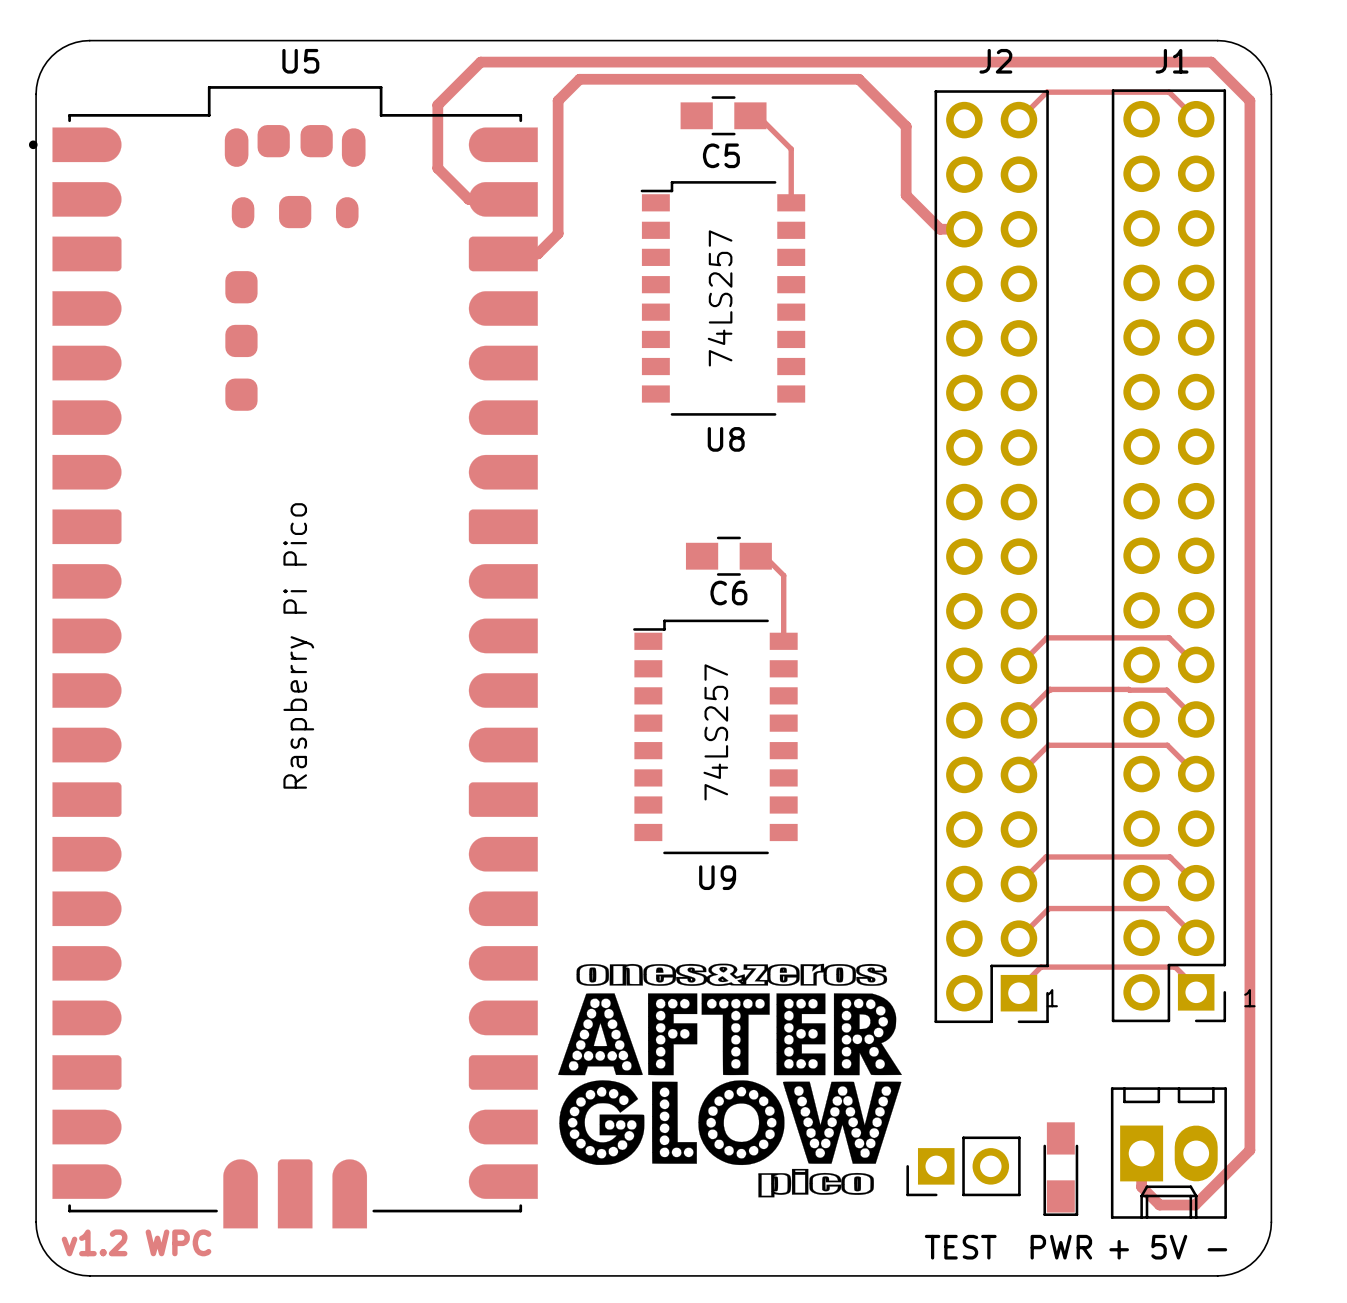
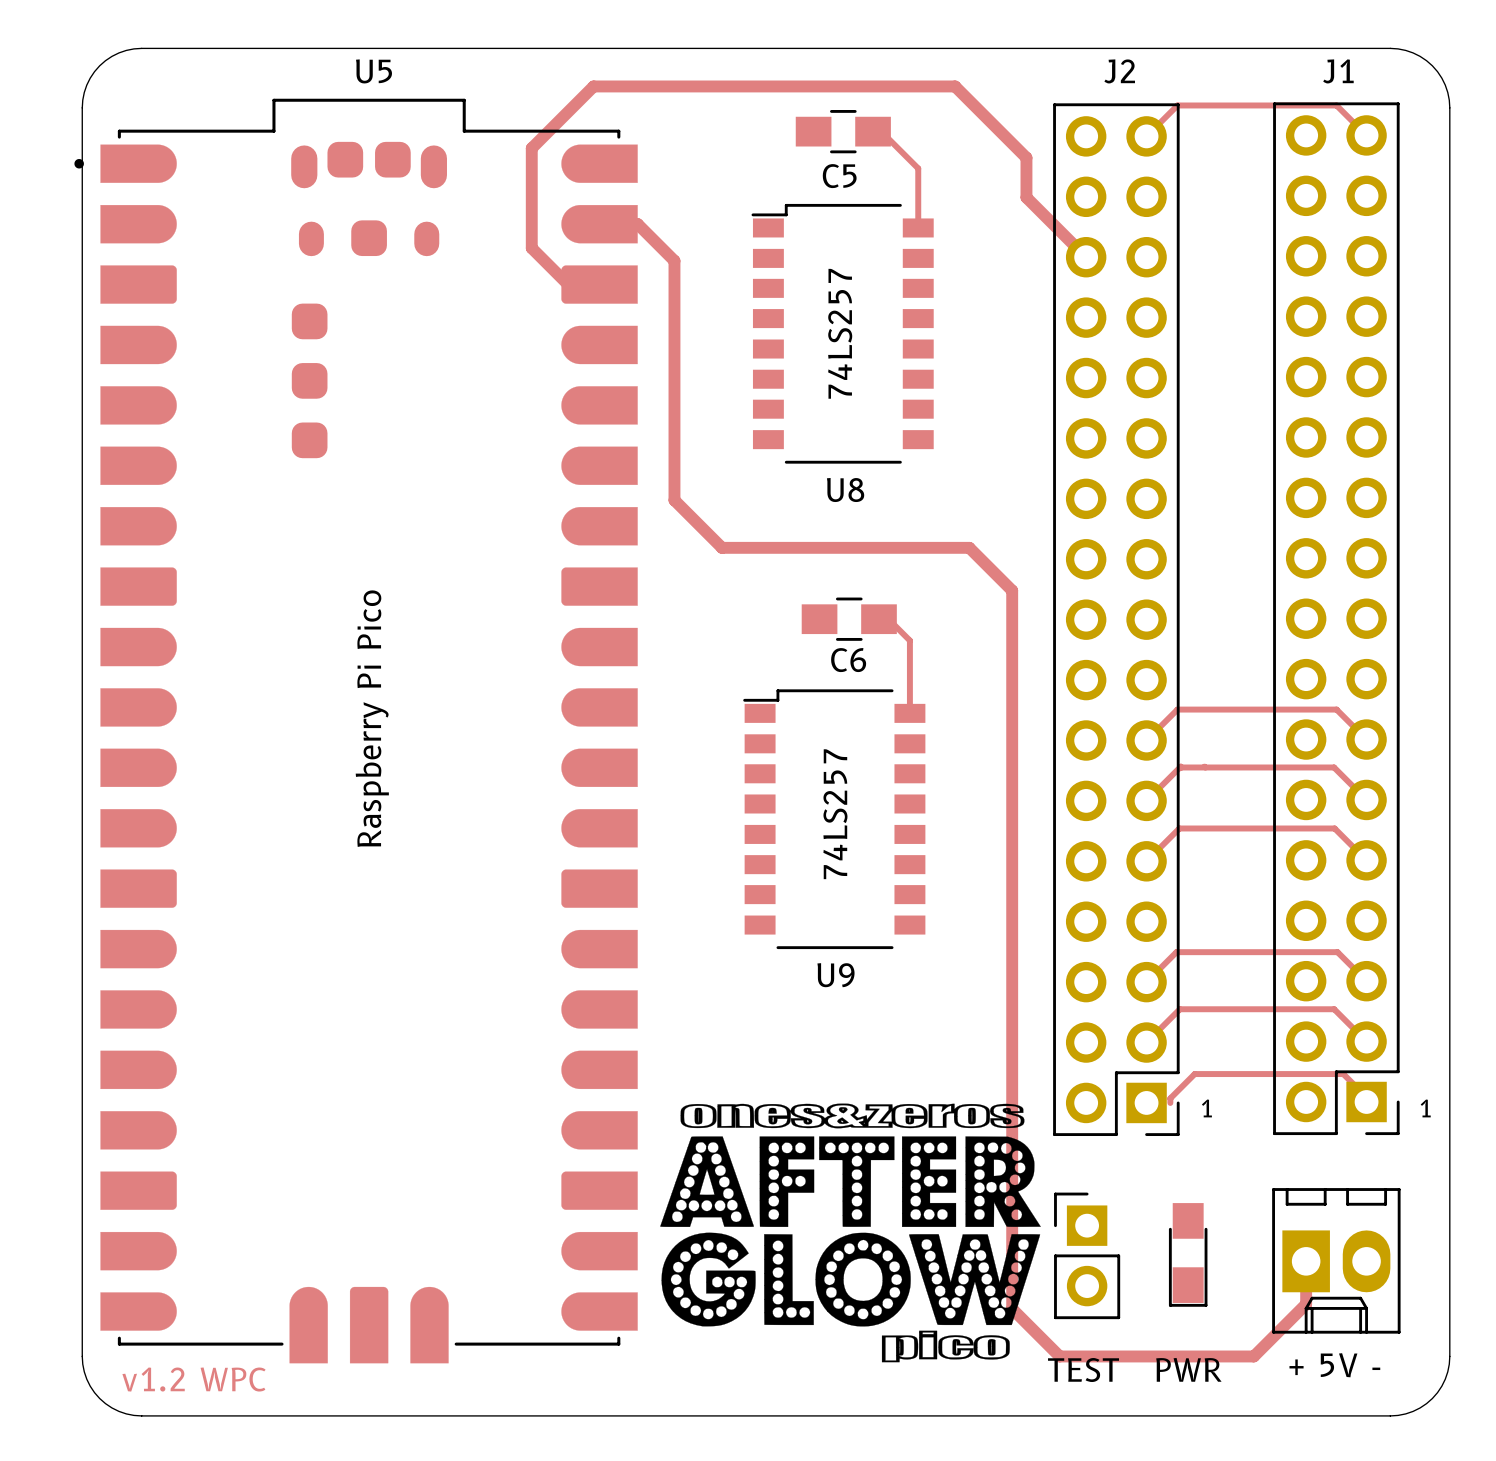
track: (1046, 92) (1018, 120) -> (1201, 105) (1177, 105) (1146, 136)
track: (503, 199) (468, 199) (437, 168) (437, 105) (480, 62) (1211, 62) (1249, 100) (1249, 1150) (1195, 1205) (1159, 1205) (1141, 1186) (1141, 1174) -> (599, 224) (637, 224) (674, 260) (674, 500) (722, 547) (969, 547) (1012, 590) (1012, 1308) (1059, 1356) (1253, 1356) (1306, 1304)
track: (964, 229) (940, 229) (906, 195) (906, 126) (858, 79) (579, 79) (558, 100) (558, 233) (537, 253) (503, 253) -> (1086, 257) (1026, 197) (1026, 157) (955, 86) (593, 86) (531, 148) (531, 248) (568, 284) (599, 284)
J2 position: (991, 556) -> (1116, 619)
track: (1046, 637) (1018, 665) -> (1201, 709) (1177, 709) (1146, 740)
track: (1129, 690) (1049, 689) (1018, 720) -> (1292, 767) (1180, 766) (1146, 800)
track: (1048, 745) (1018, 774) -> (1203, 828) (1179, 828) (1146, 861)
track: (1046, 856) (1018, 884) -> (1200, 952) (1176, 952) (1146, 982)
track: (1049, 908) (1018, 938) -> (1203, 1009) (1179, 1009) (1146, 1042)
drawing position: (730, 1080) -> (850, 1232)
+ 5V - position: (1168, 1153) -> (1336, 1260)
TEST rotation: 0° (963, 1166) -> 90° clockwise (1087, 1255)
PWR position: (1060, 1169) -> (1188, 1254)
PWR name position: PWR (1061, 1247) -> PWR (1188, 1369)

